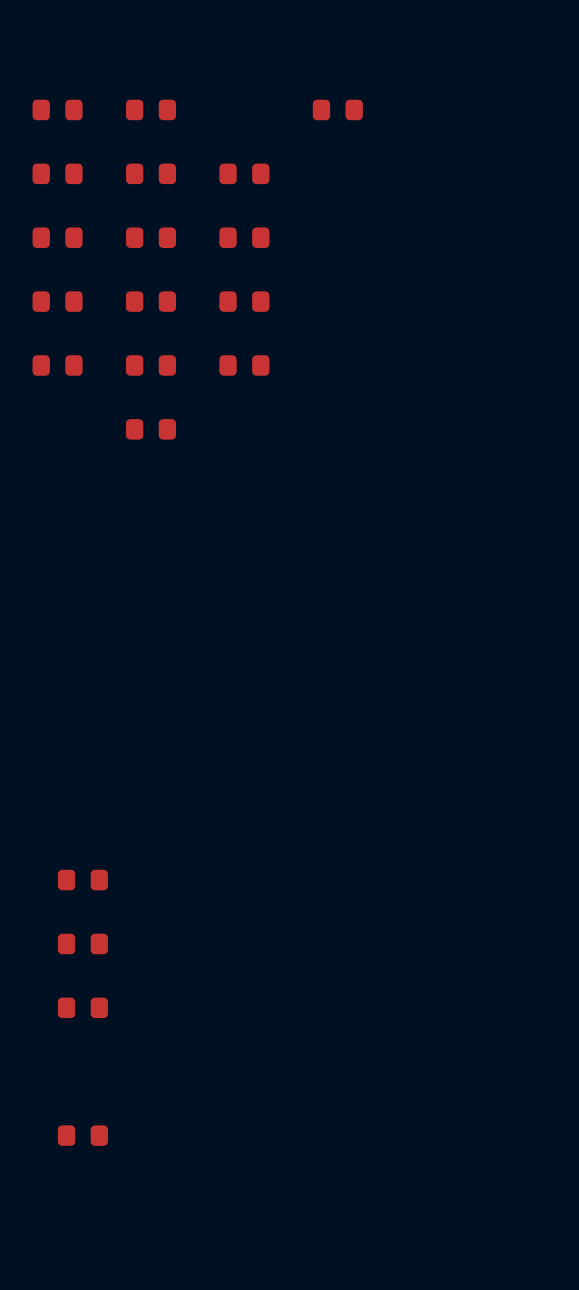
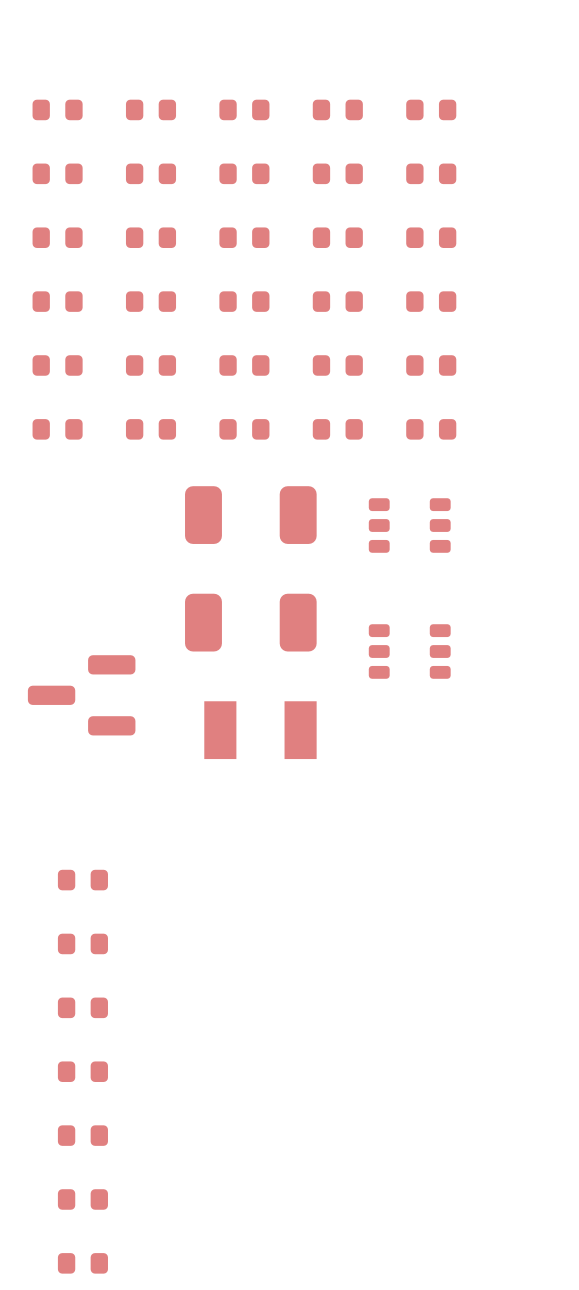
part: none -> (244, 109)
part: none -> (431, 109)
part: none -> (337, 173)
part: none -> (431, 173)
part: none -> (337, 237)
part: none -> (431, 237)
part: none -> (337, 301)
part: none -> (431, 301)
part: none -> (337, 365)
part: none -> (431, 365)
part: none -> (57, 429)
part: none -> (244, 429)
part: none -> (337, 429)
part: none -> (431, 429)
part: none -> (250, 515)
part: none -> (409, 525)
part: none -> (250, 622)
part: none -> (409, 651)
part: none -> (81, 695)
part: none -> (260, 730)
part: none -> (82, 1071)
part: none -> (82, 1199)
part: none -> (82, 1263)

